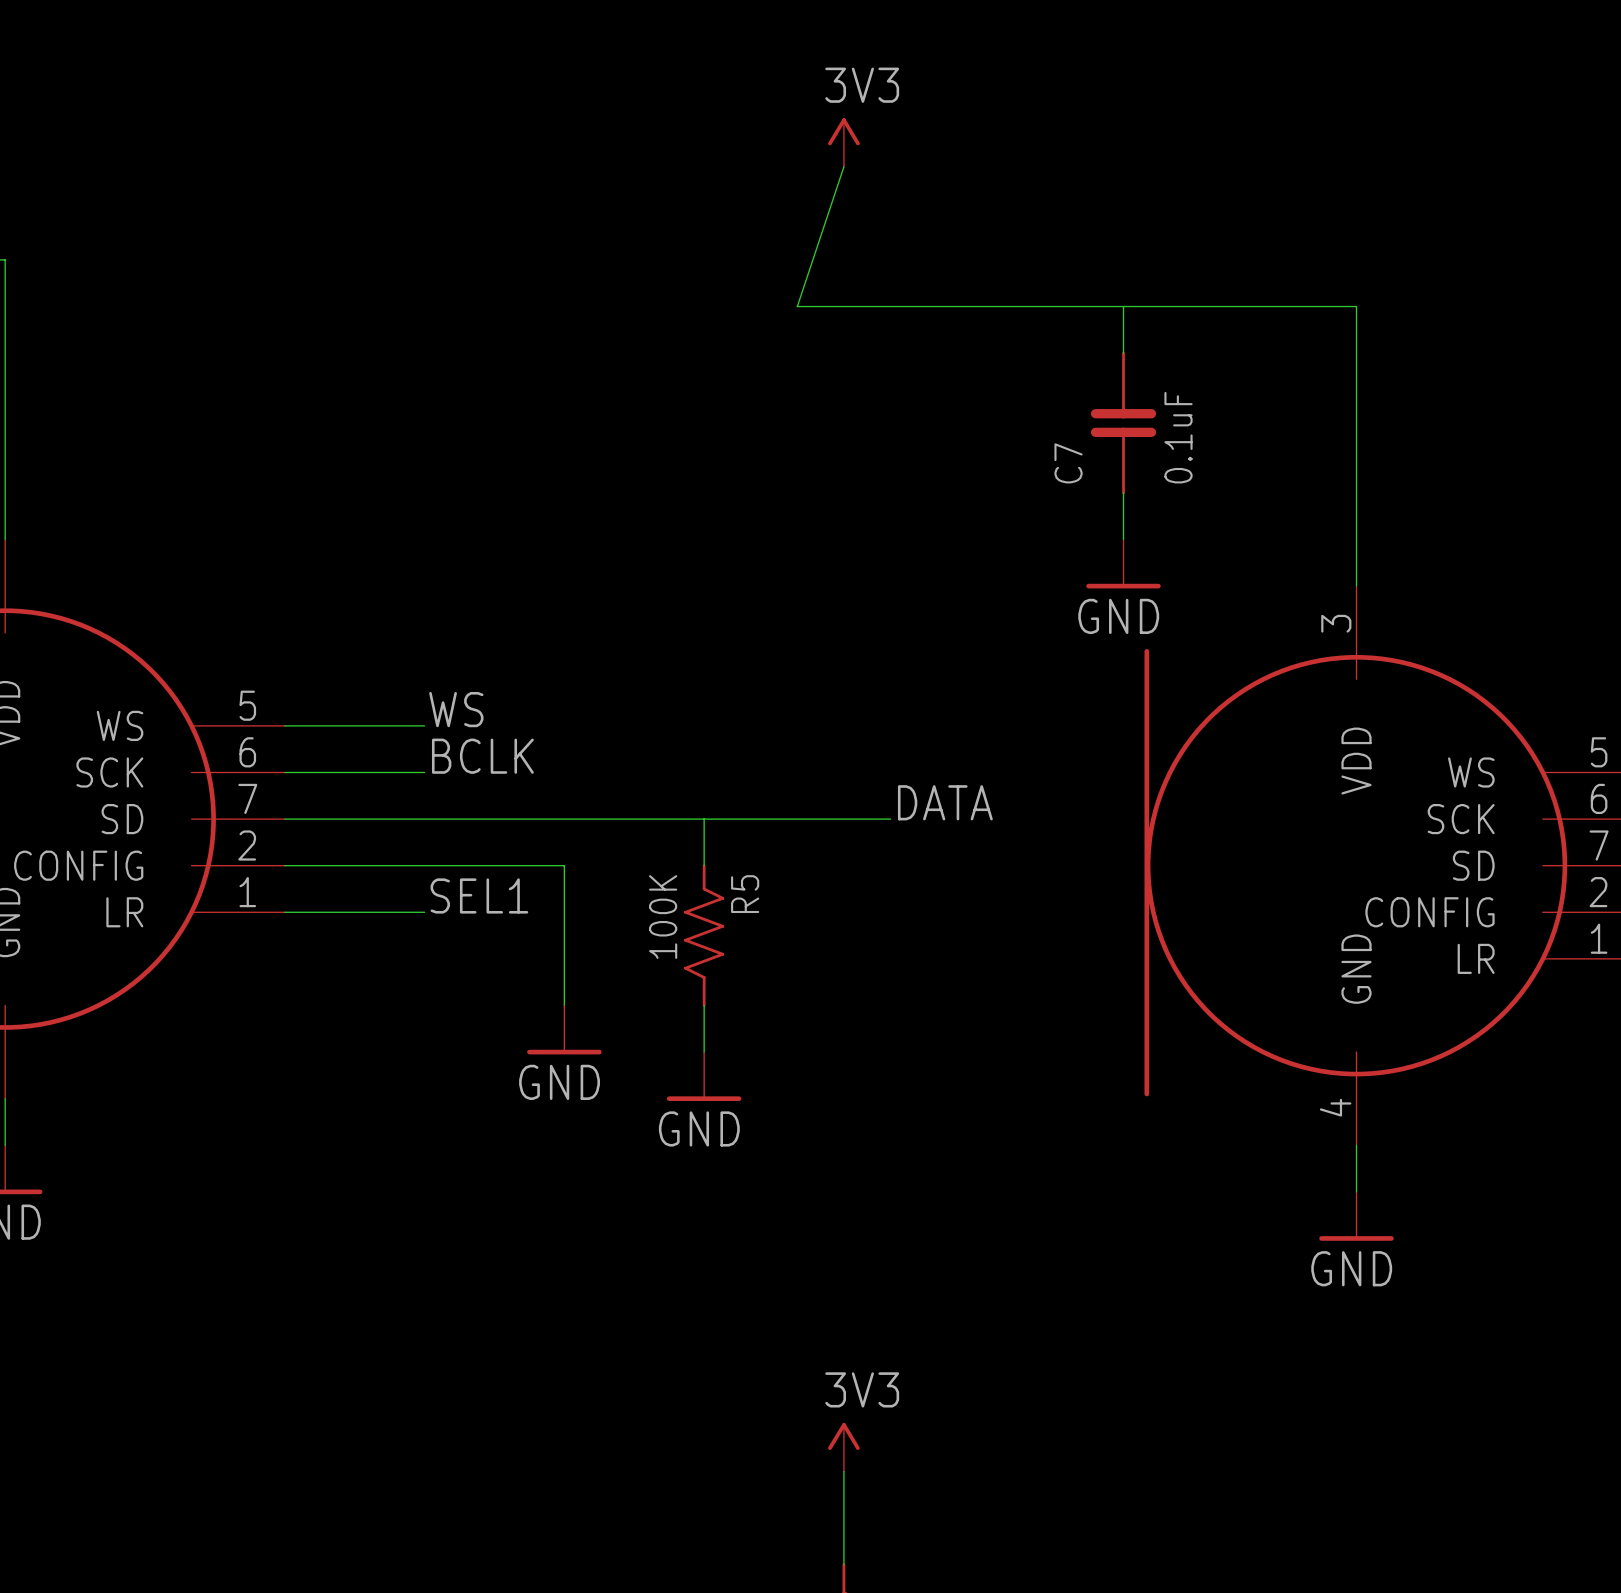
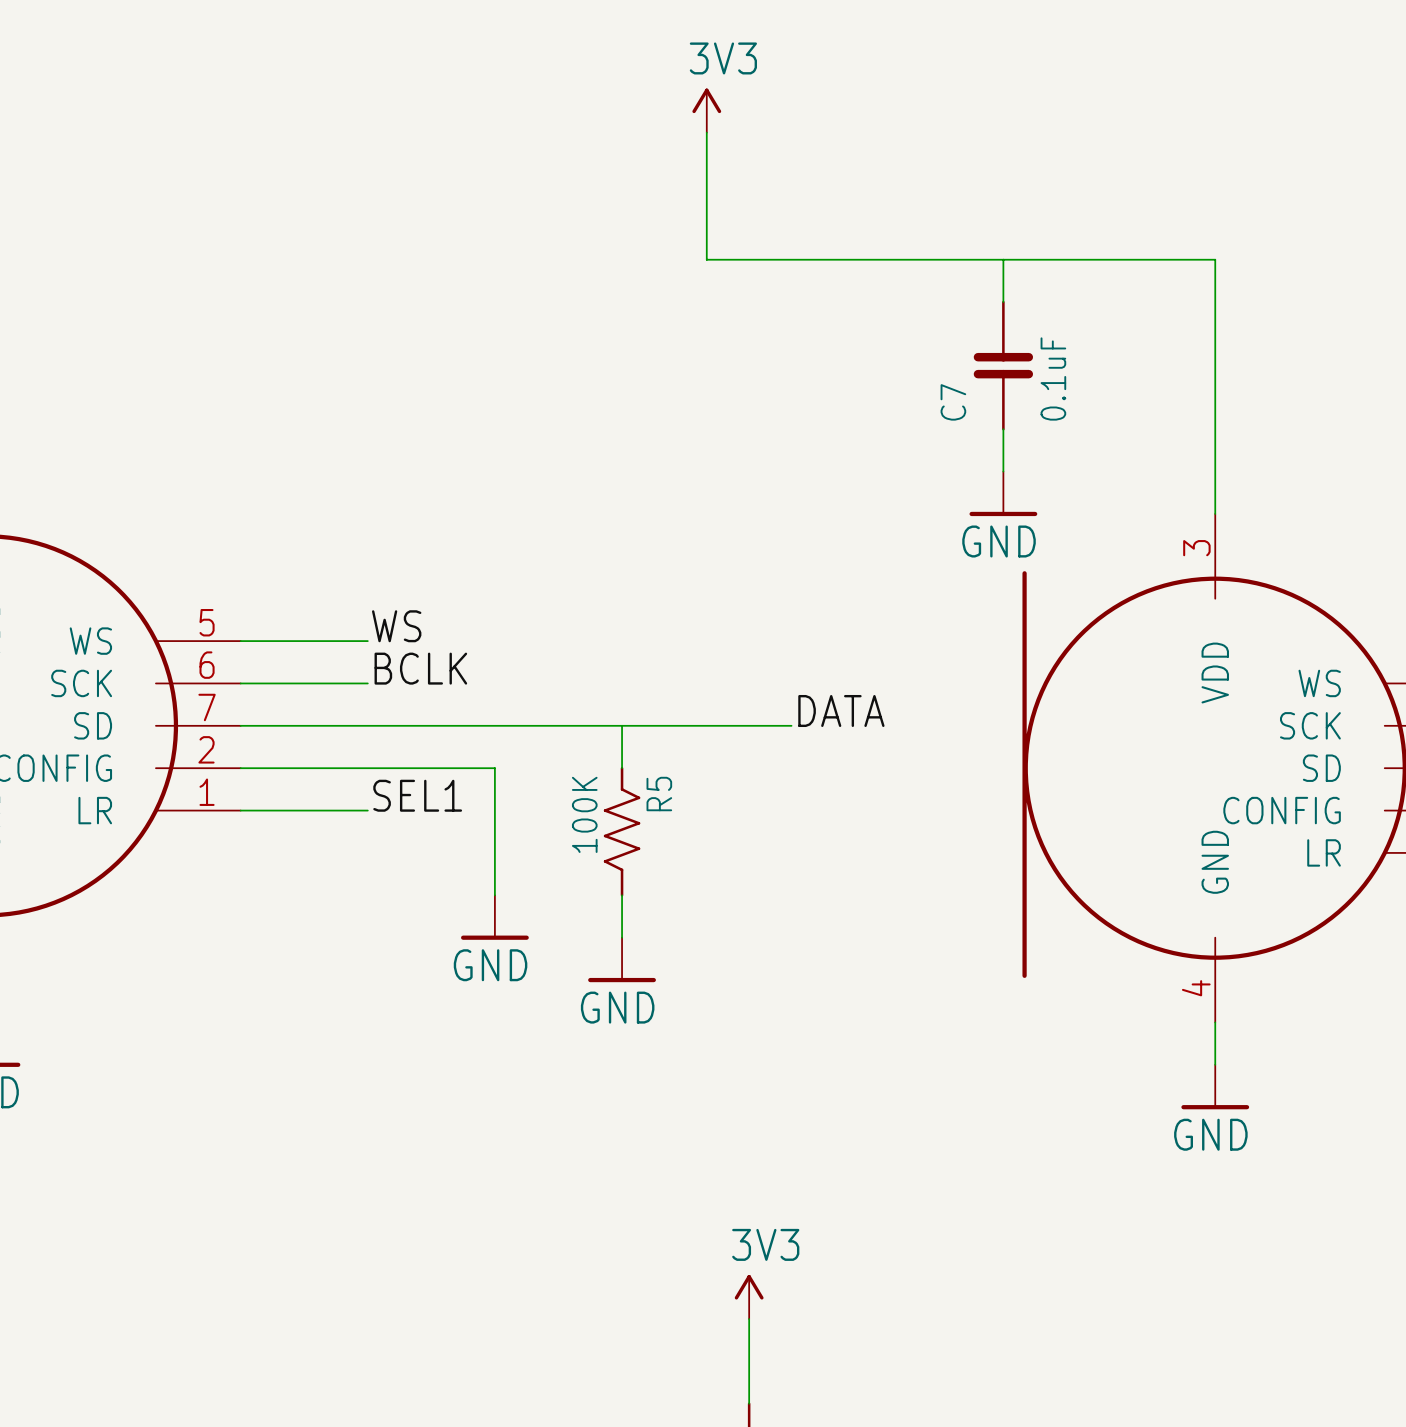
power symbol position: 3V3 (843, 142) -> 3V3 (706, 110)
wire: (843, 166) (797, 306) -> (706, 132) (706, 259)

